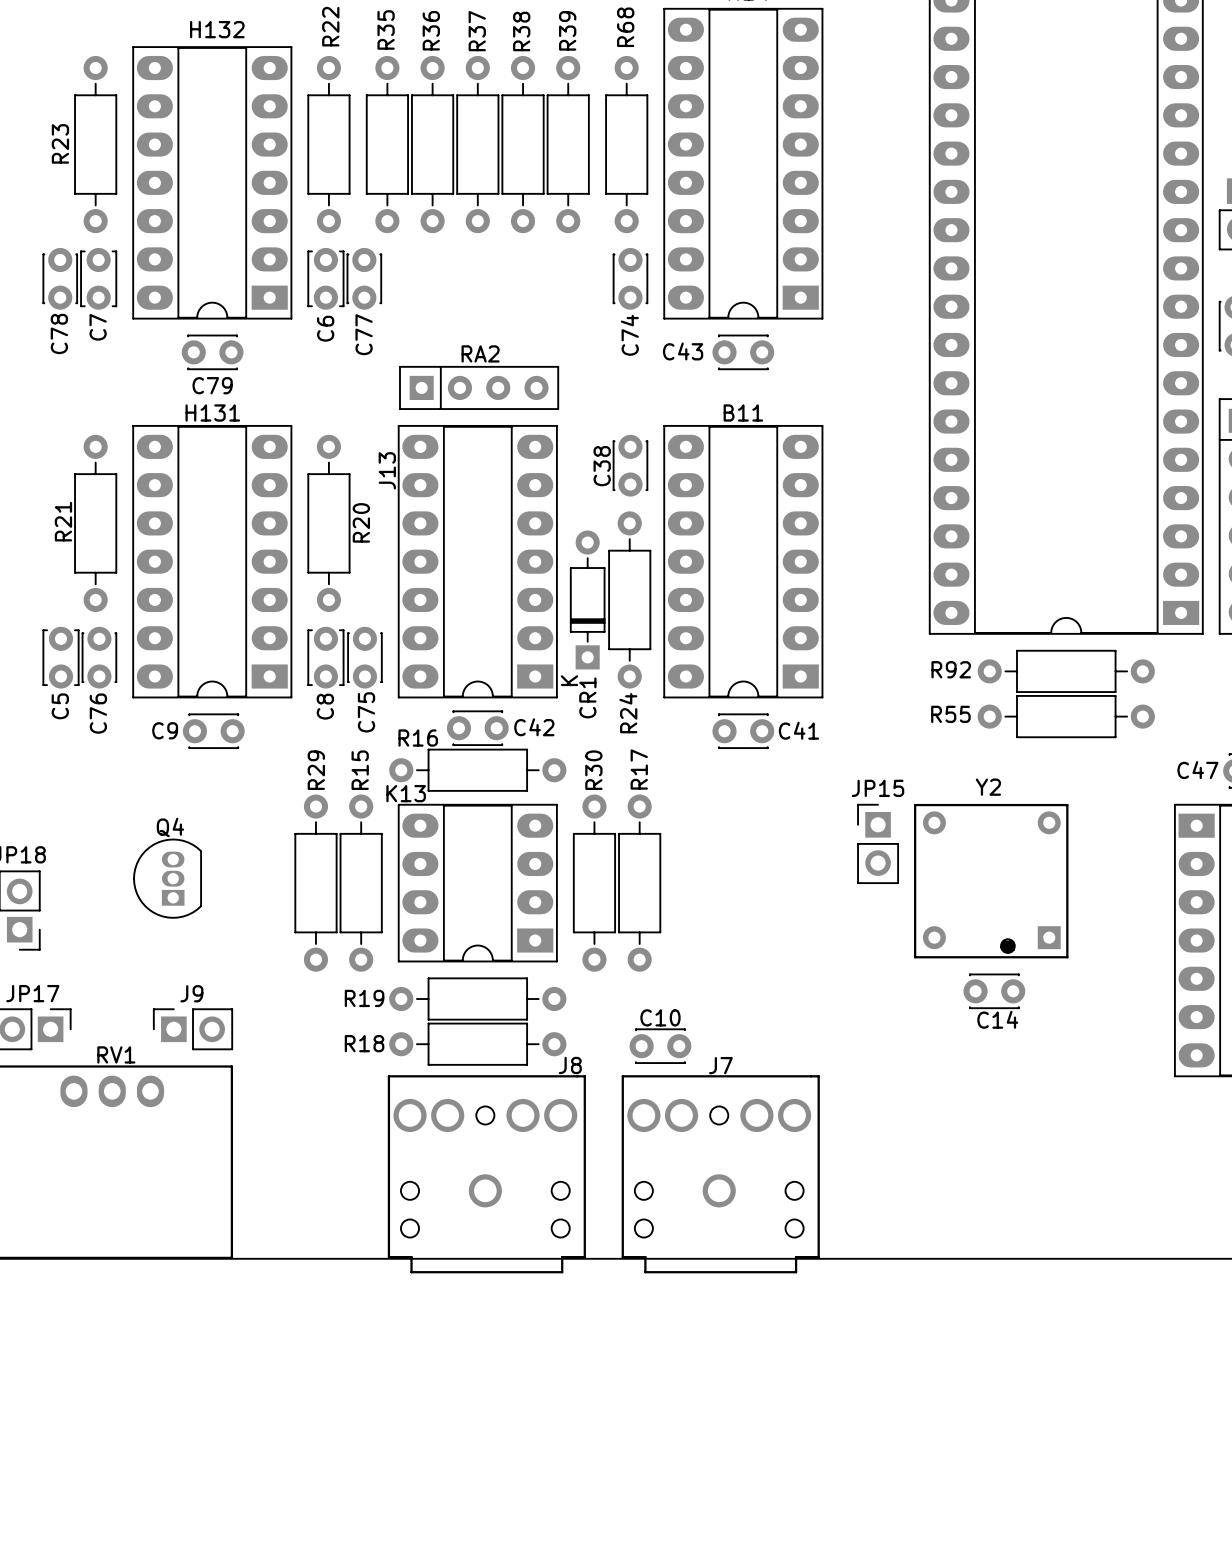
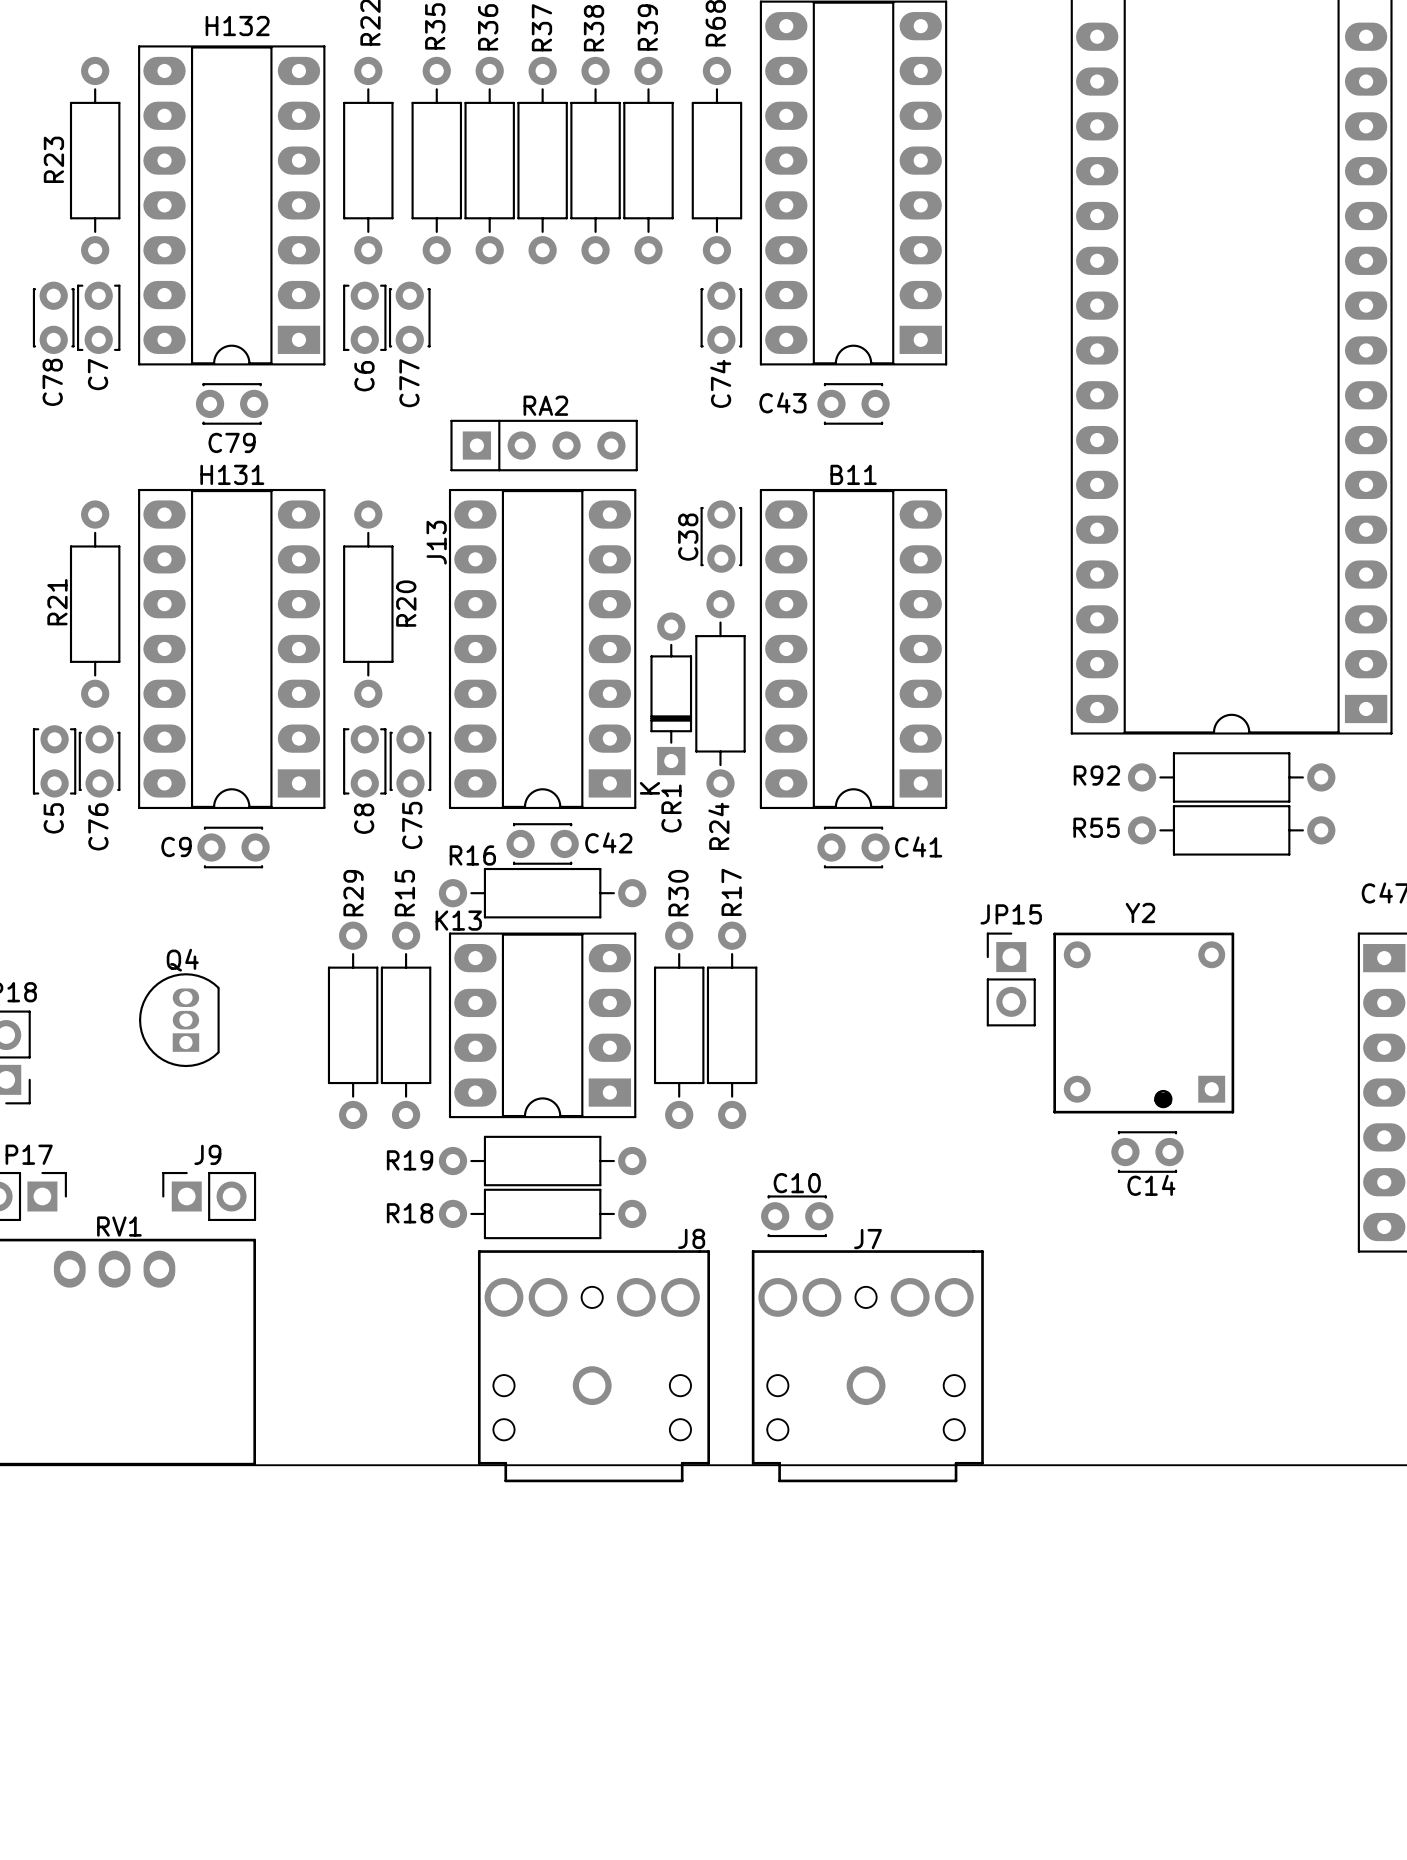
C10 position: (660, 1046) -> (797, 1216)
J8 position: (486, 1174) -> (593, 1366)
J7 position: (720, 1174) -> (867, 1366)

